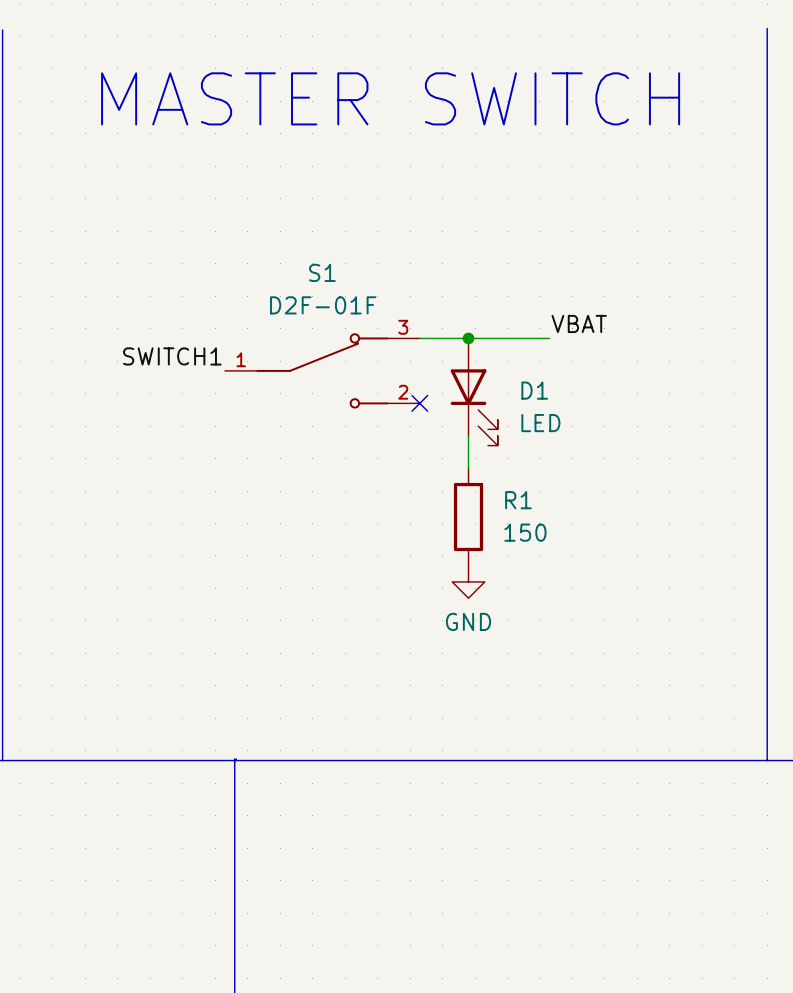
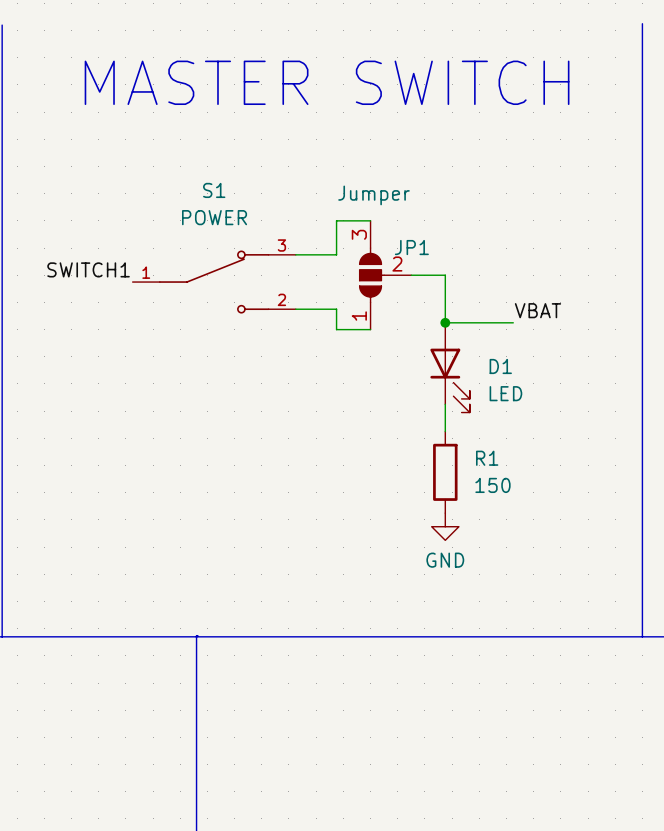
wire: none -> (370, 220) (336, 220) (336, 254) (295, 254)
S1 name position: S1 (322, 272) -> S1 (214, 190)
S1 value: D2F-01F (323, 305) -> POWER (214, 217)
label position: VBAT (579, 323) -> VBAT (537, 310)
JP1: none -> Jumper (385, 275)
wire: none -> (411, 275) (445, 275) (445, 324)
wire: (419, 338) (549, 338) -> none
junction: (468, 338) -> none
label position: SWITCH1 (172, 356) -> SWITCH1 (88, 269)
wire: none -> (295, 309) (336, 309) (336, 329) (370, 329)
S1 position: (322, 370) -> (214, 282)
wire: none -> (445, 322) (513, 322)
junction: none -> (445, 322)
D1 position: (474, 392) -> (450, 367)
no-connect mark: (419, 403) -> none
wire: (468, 435) (468, 468) -> (445, 404) (445, 431)
R1 position: (468, 517) -> (445, 472)
power symbol position: GND (468, 581) -> GND (445, 526)

